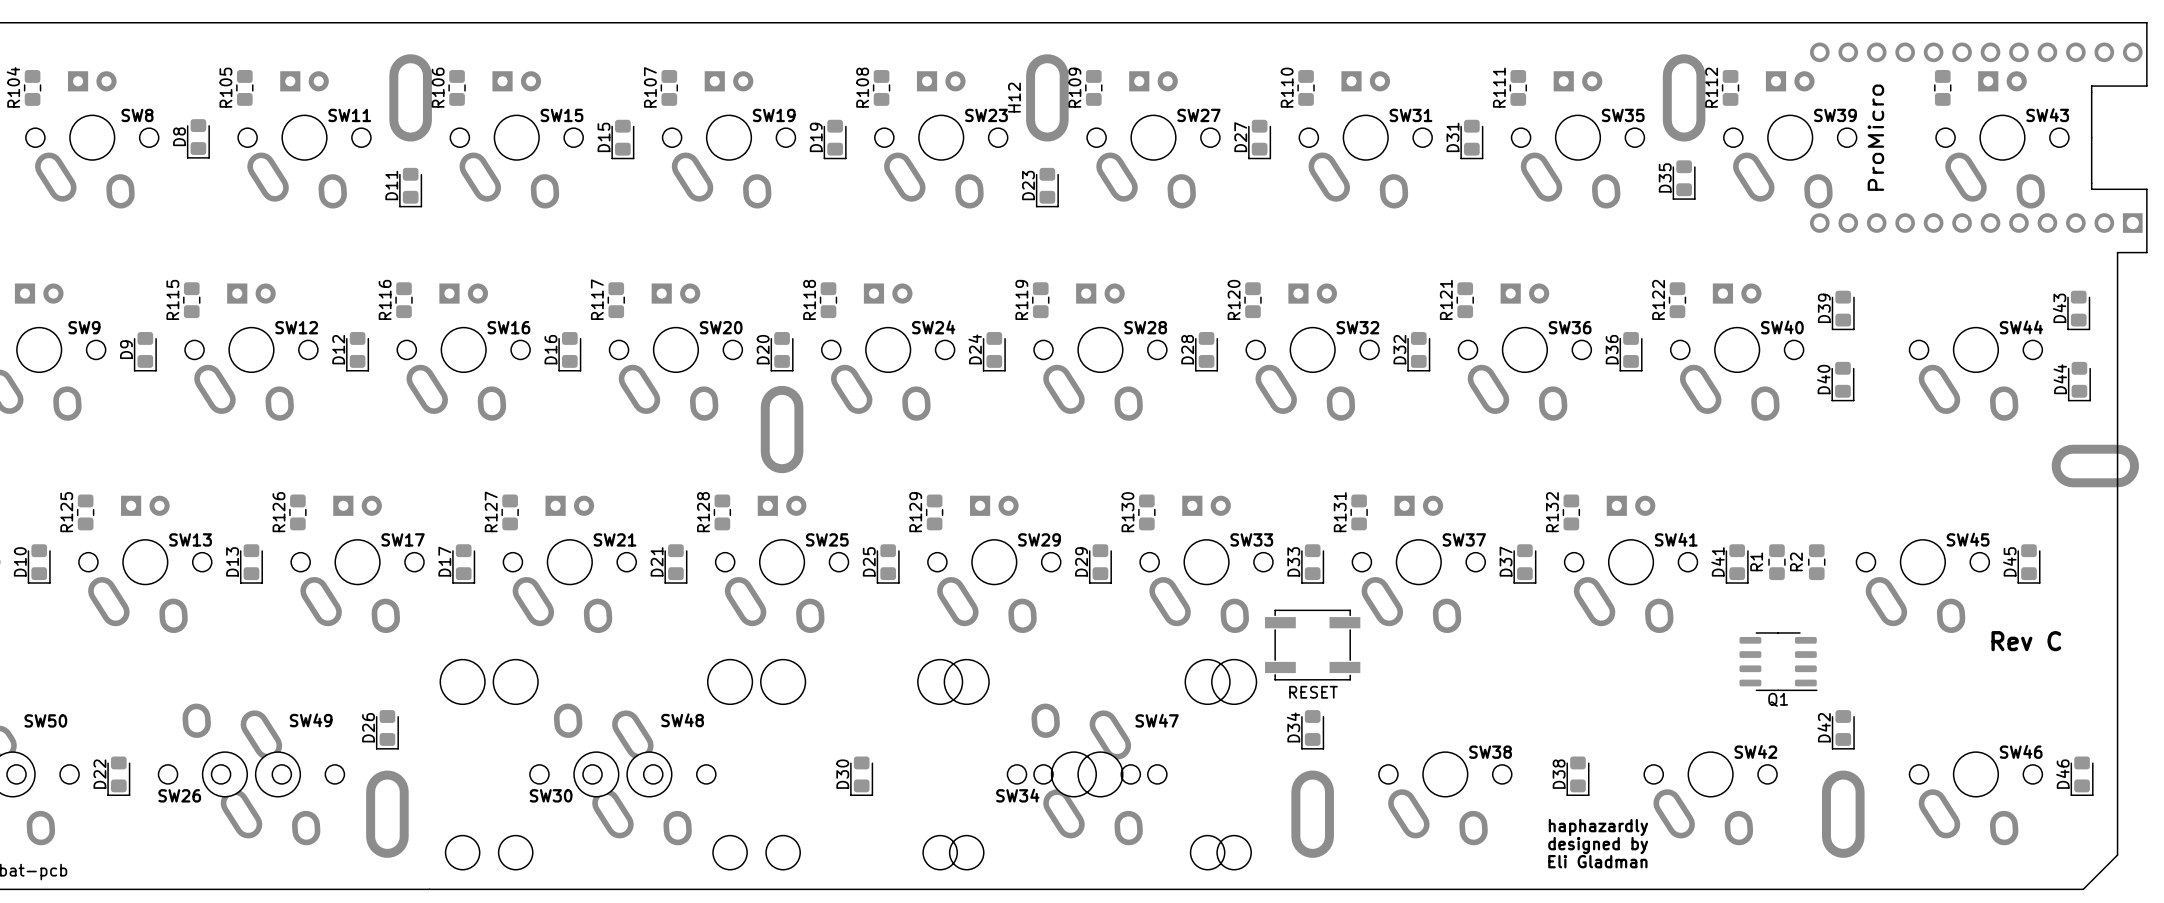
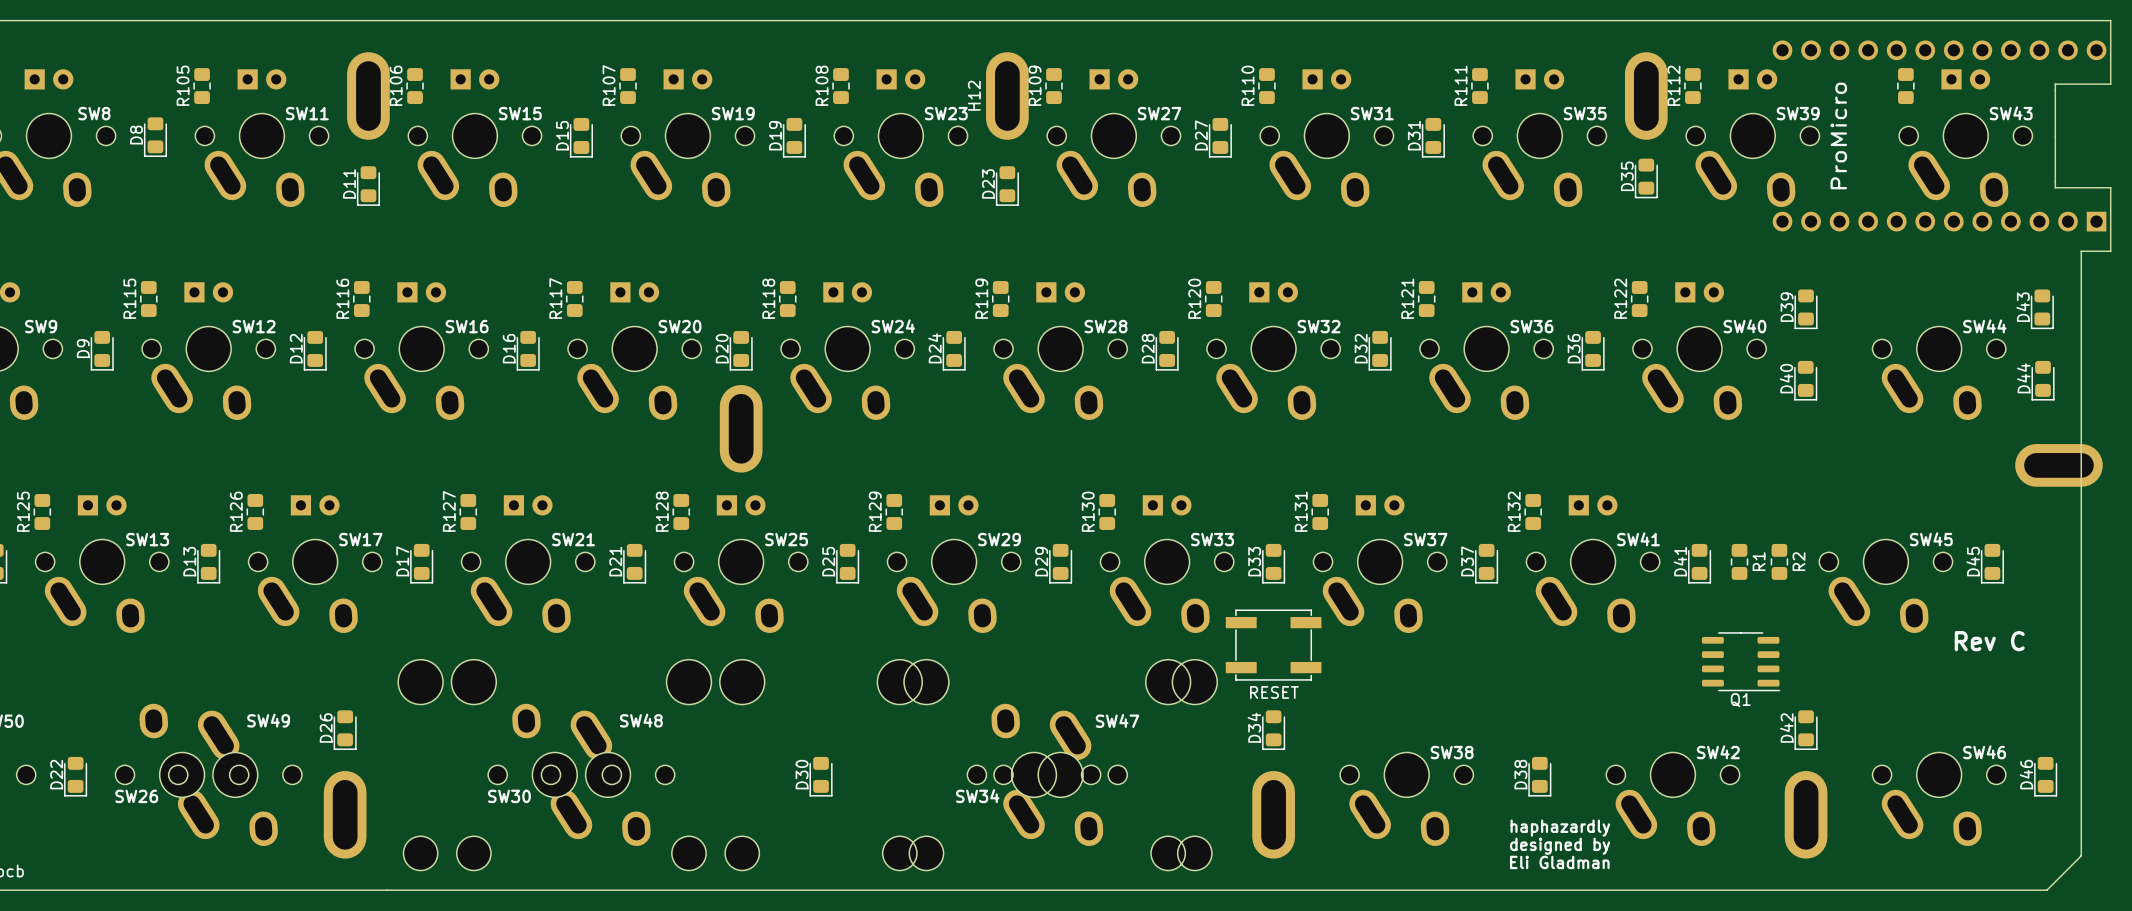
R1 name position: R1 (1756, 561) -> R1 (1759, 561)
R2 name position: R2 (1796, 561) -> R2 (1798, 561)

